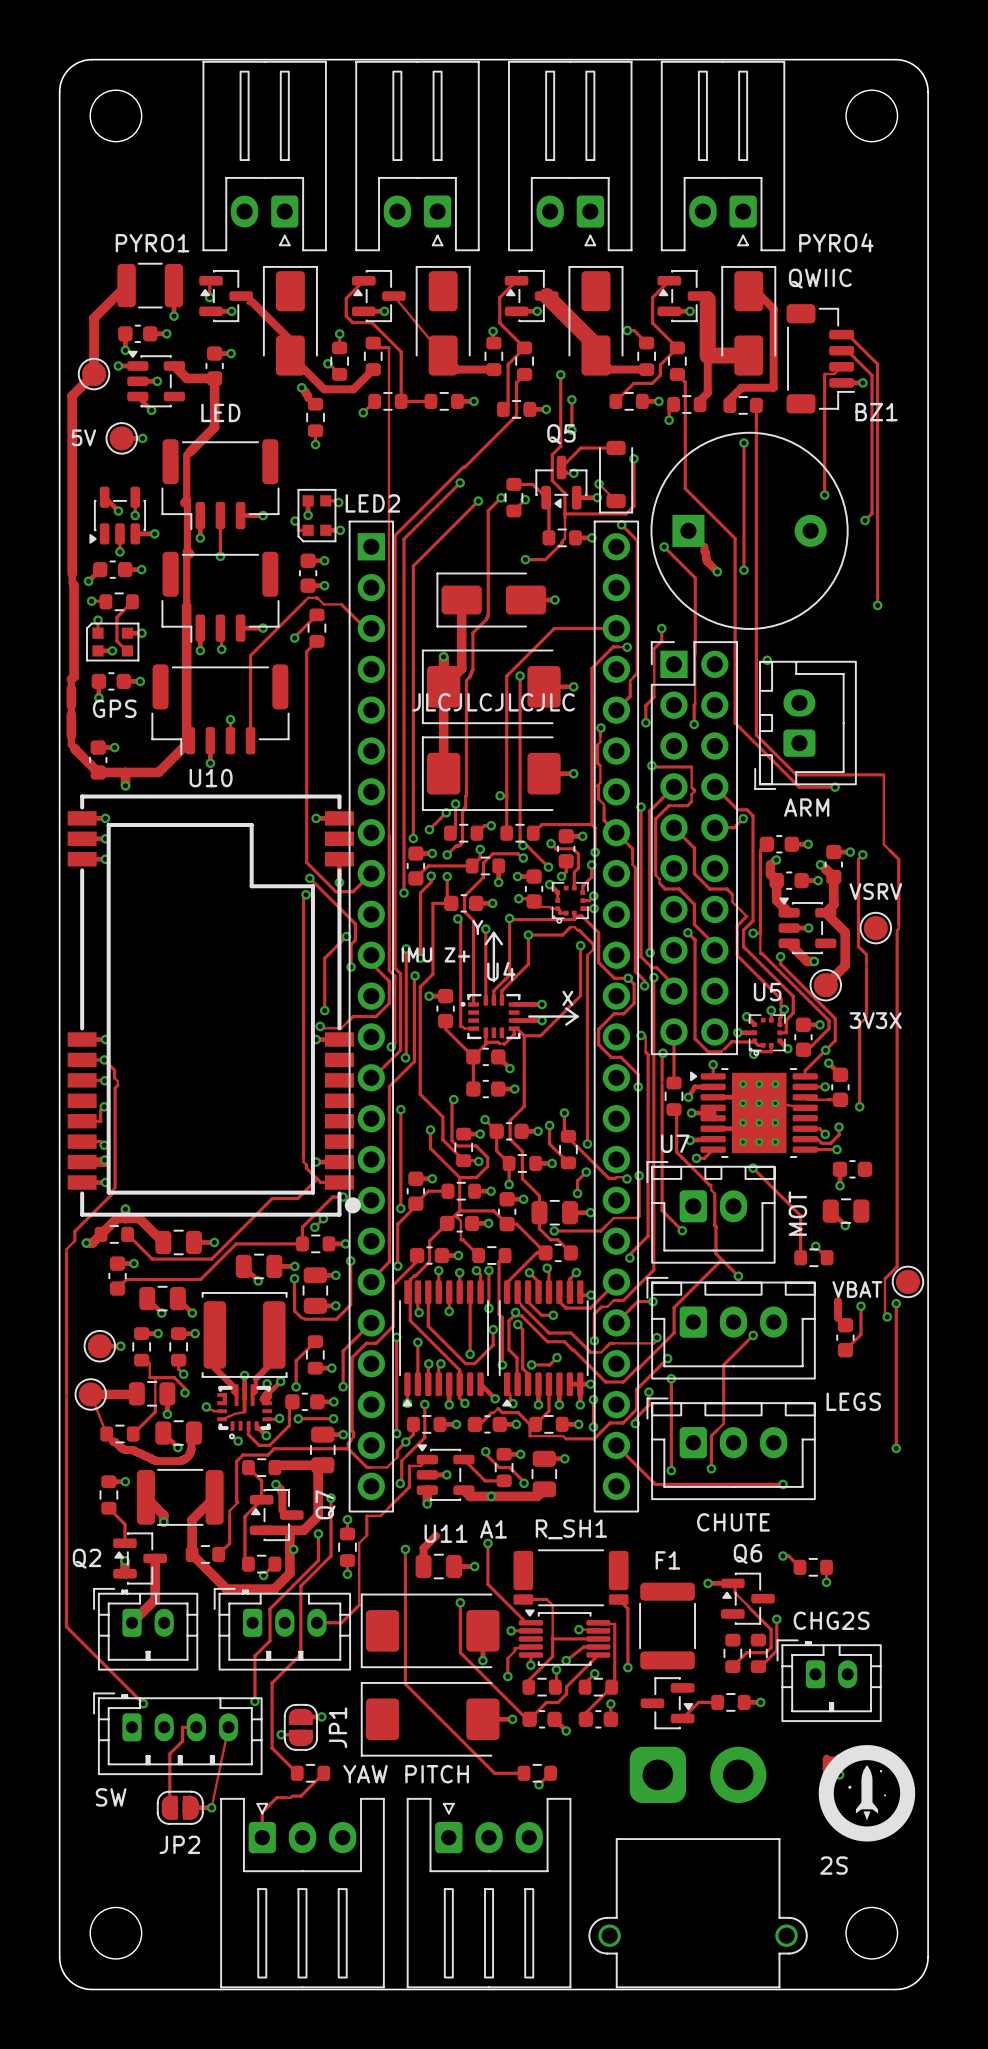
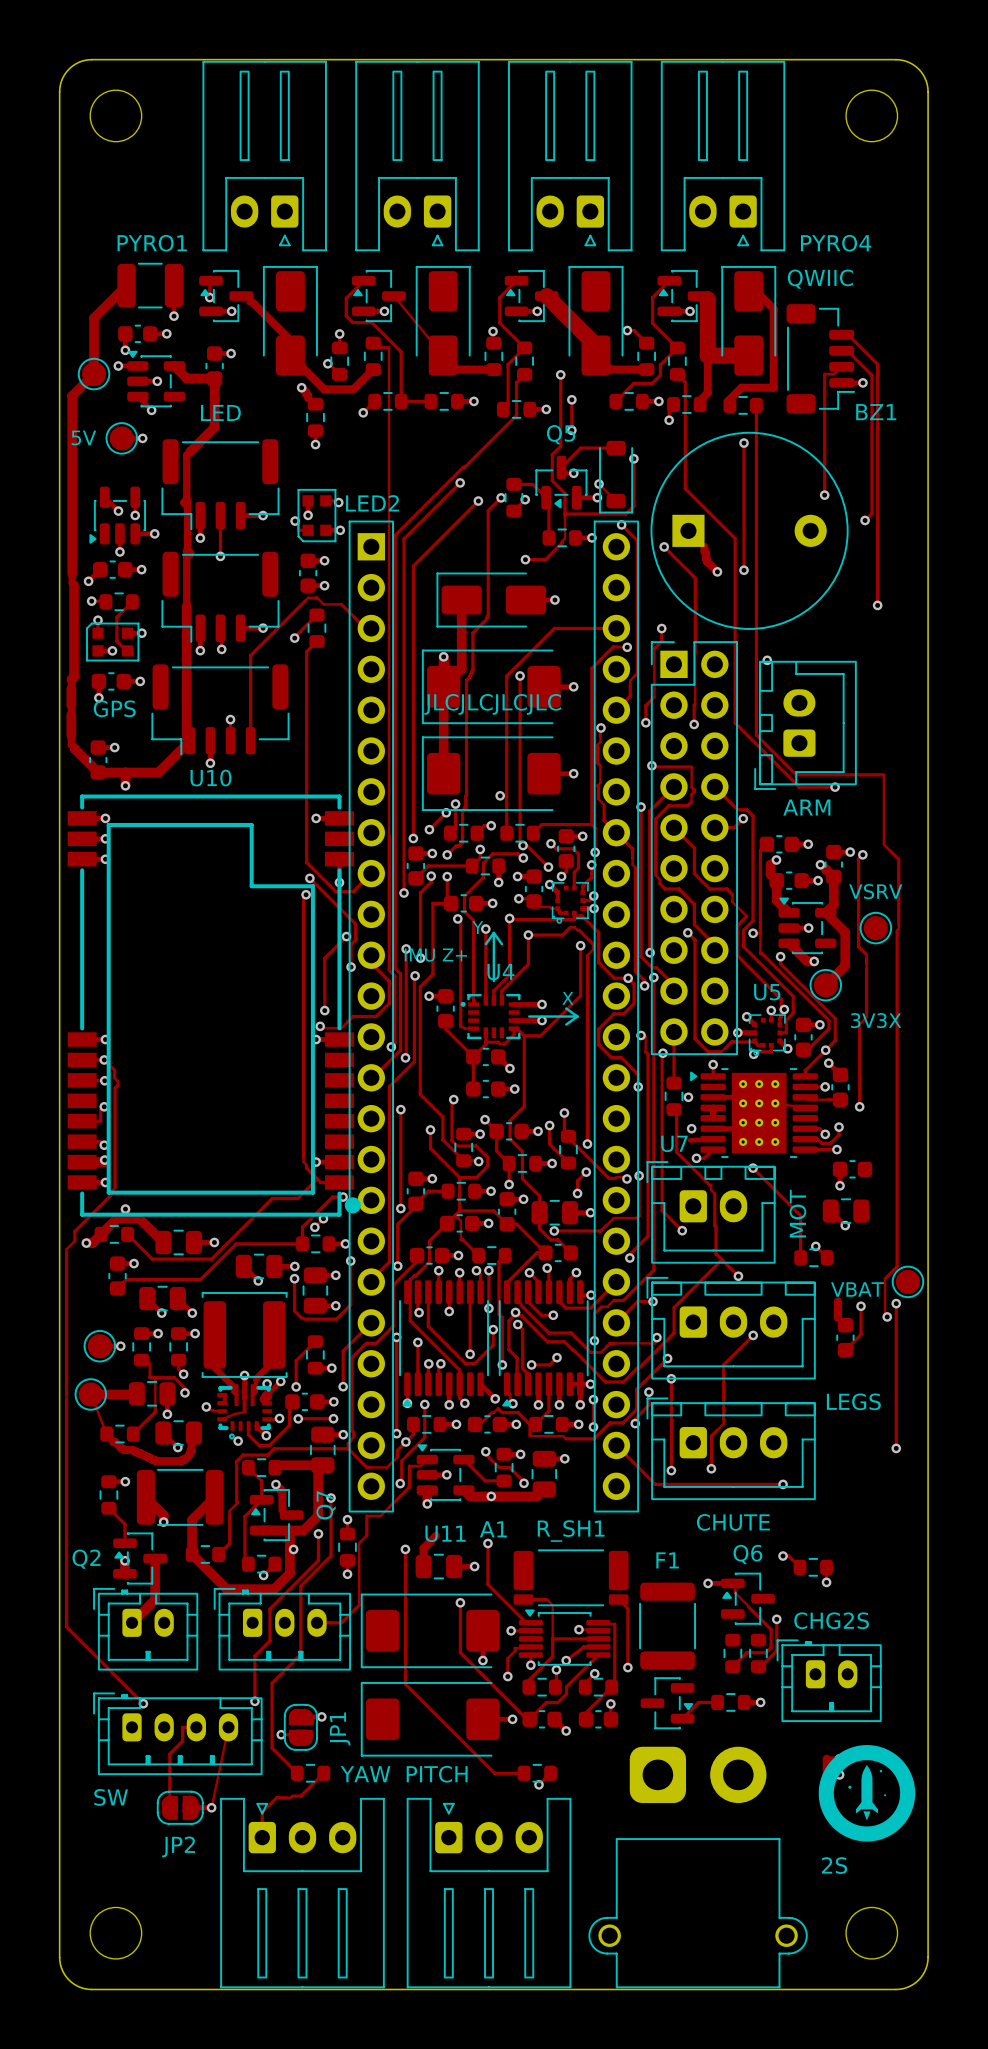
track: (713, 1086) (694, 1086) (688, 1097) -> none
track: (691, 1113) (713, 1113) -> none
via: (691, 1113) -> none
via: none -> (691, 1128)
via: (690, 1140) -> none

